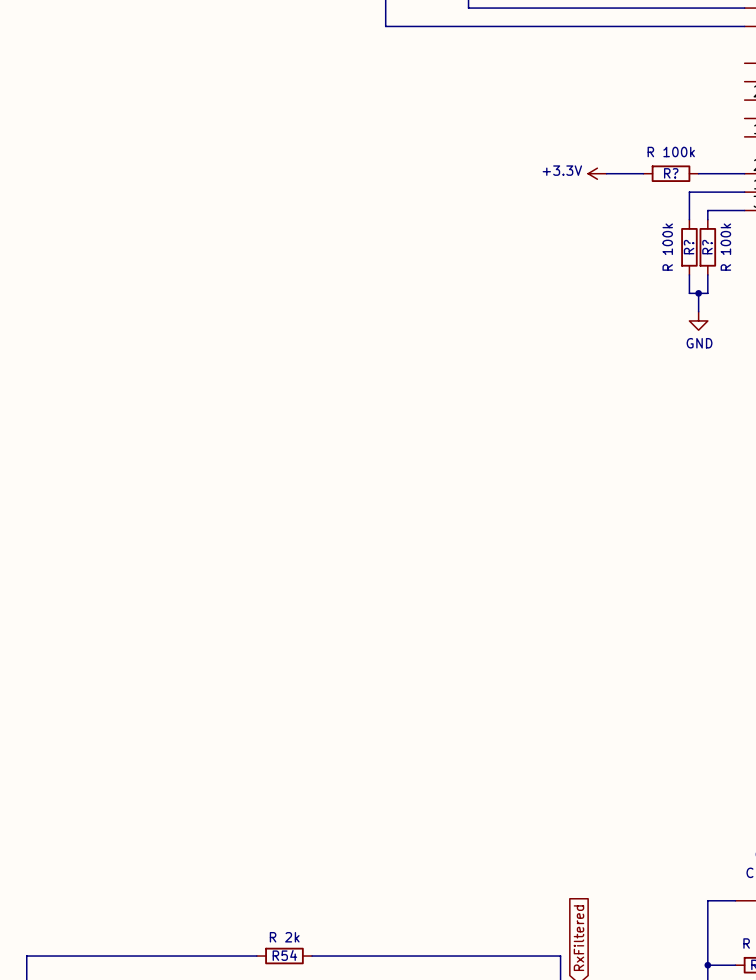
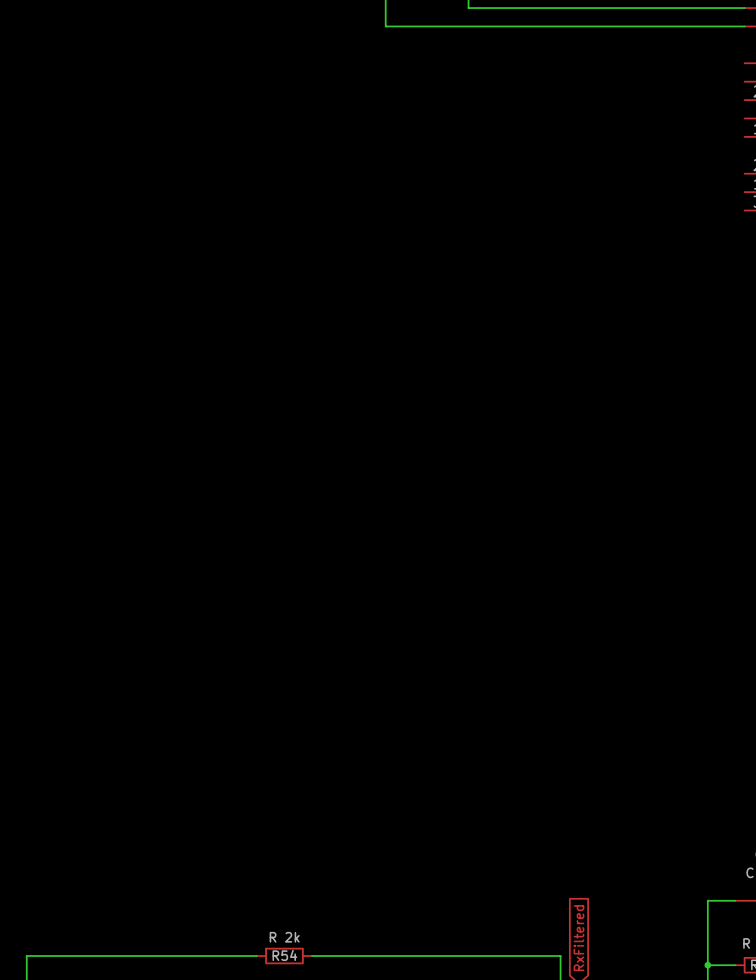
power symbol: +3.3V (597, 173) -> none
wire: (606, 173) (643, 173) -> none
R?: R 100k (671, 173) -> none
wire: (698, 173) (744, 173) -> none
wire: (744, 192) (689, 192) (689, 219) -> none
wire: (744, 210) (707, 210) (707, 219) -> none
R?: R 100k (689, 247) -> none
R?: R 100k (707, 247) -> none
wire: (689, 274) (689, 293) (707, 293) (707, 274) -> none
wire: (698, 293) (698, 311) -> none
junction: (698, 293) -> none
power symbol: GND (698, 320) -> none

